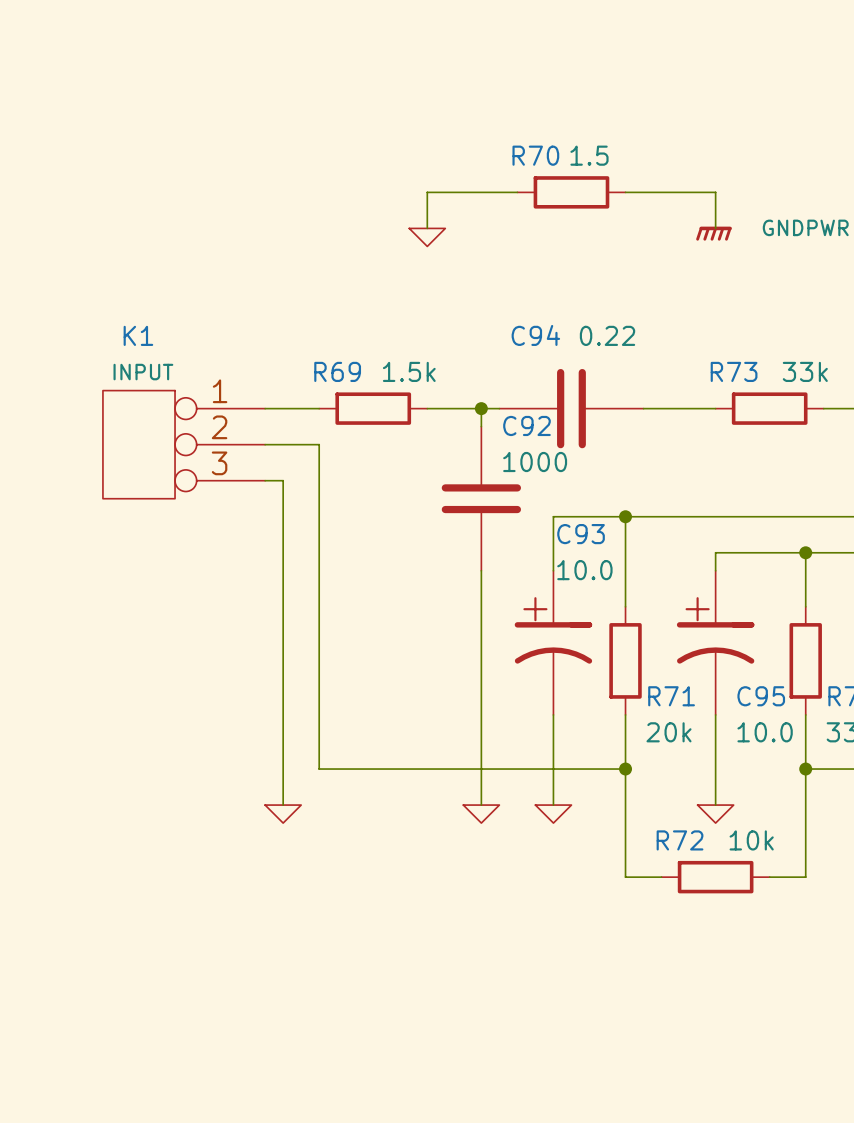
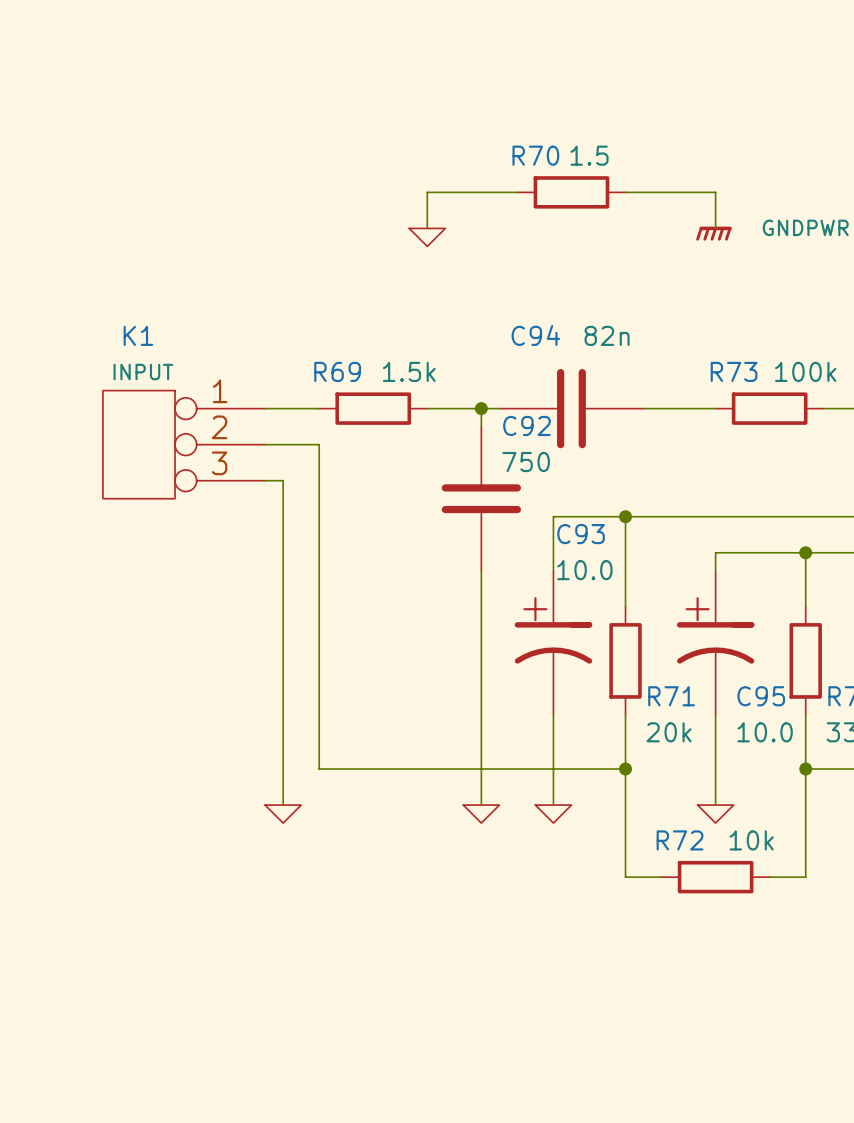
C94 value: 0.22 (607, 335) -> 82n (607, 335)
R73 value: 33k (805, 371) -> 100k (805, 371)
C92 value: 1000 (535, 462) -> 750 (526, 462)

